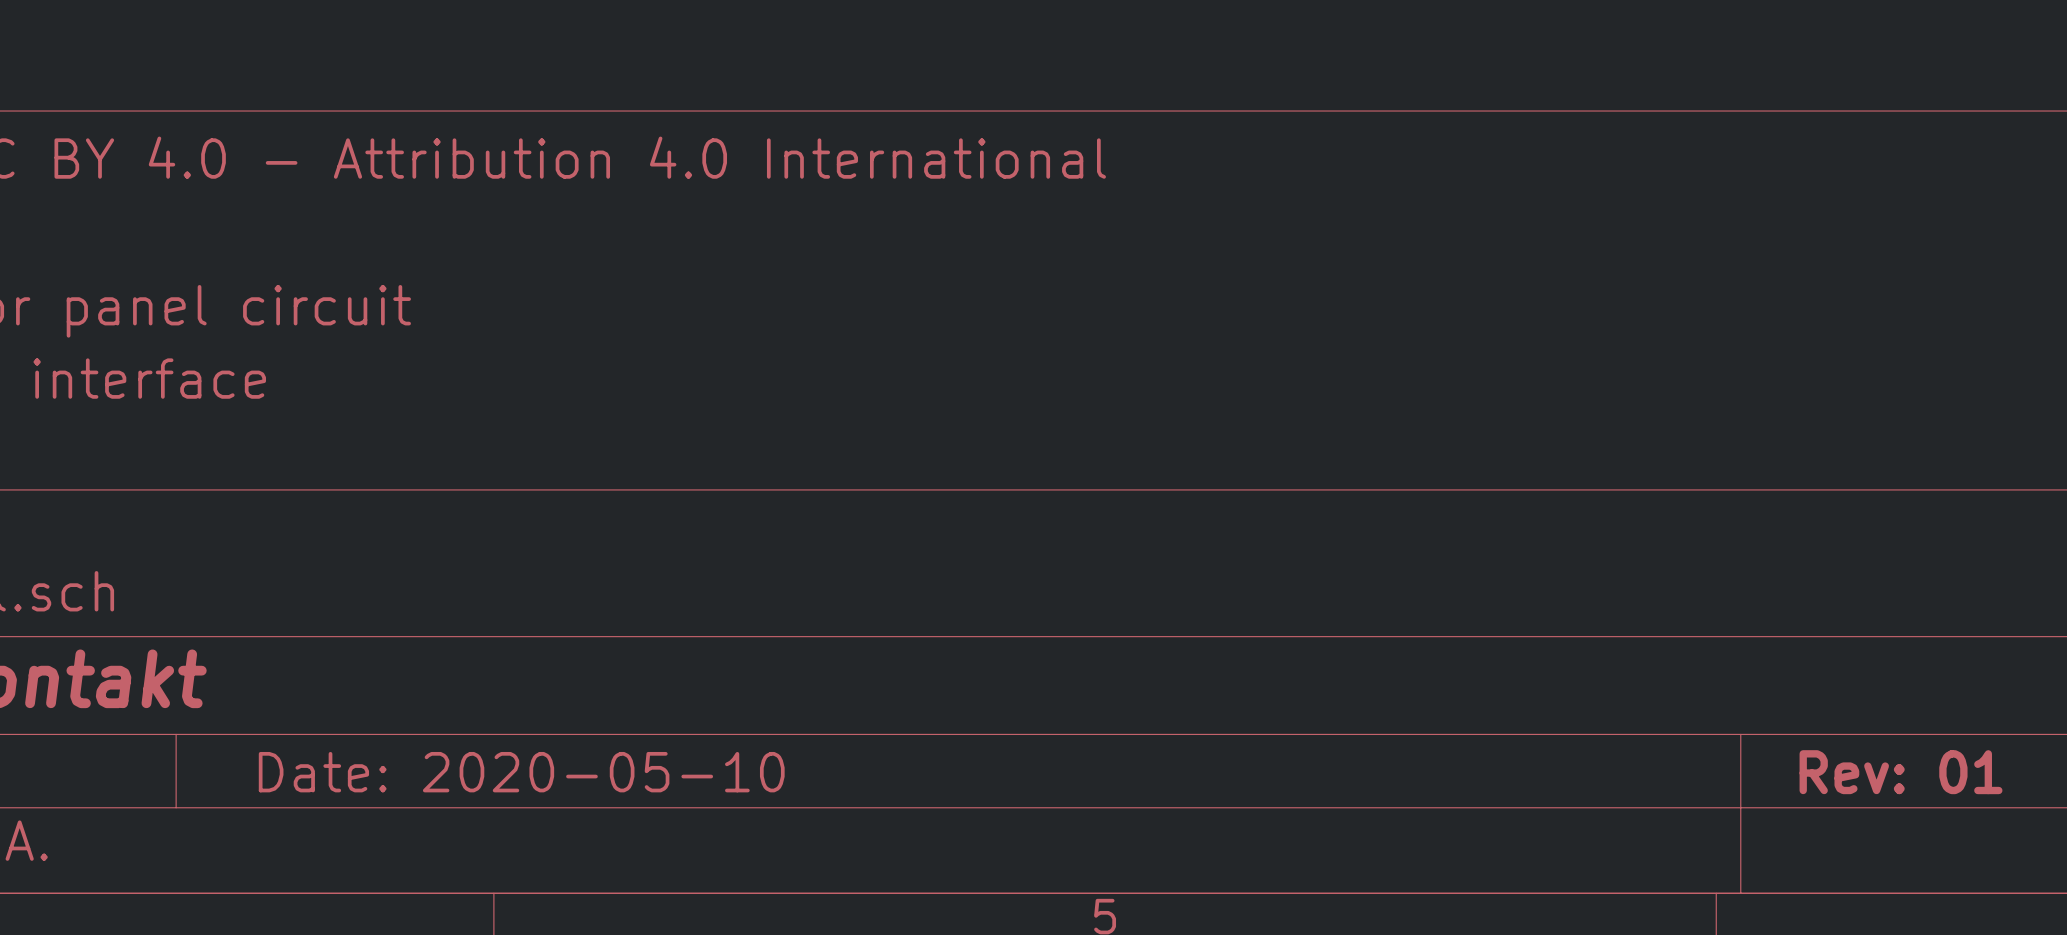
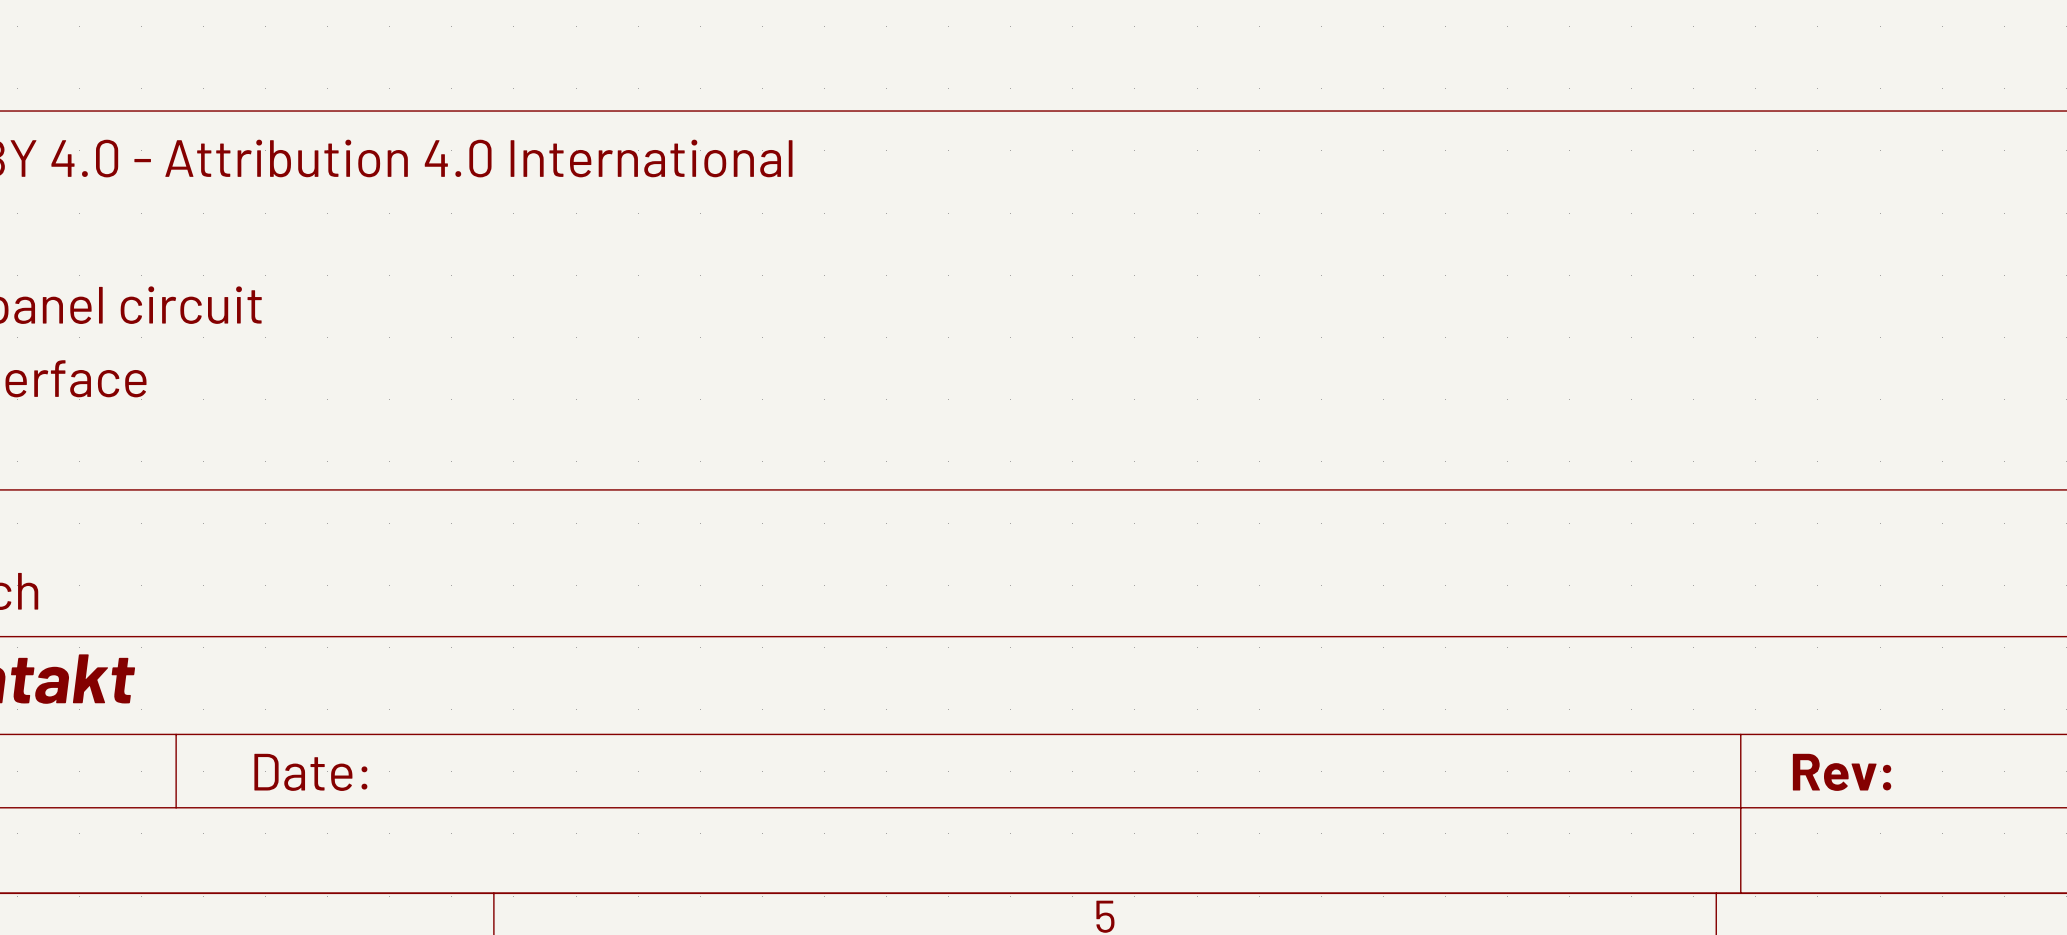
title block: Date: 2020-05-10 (521, 772) -> Date: (310, 772)
title block: Rev: 01 (1901, 772) -> Rev: (1842, 772)

